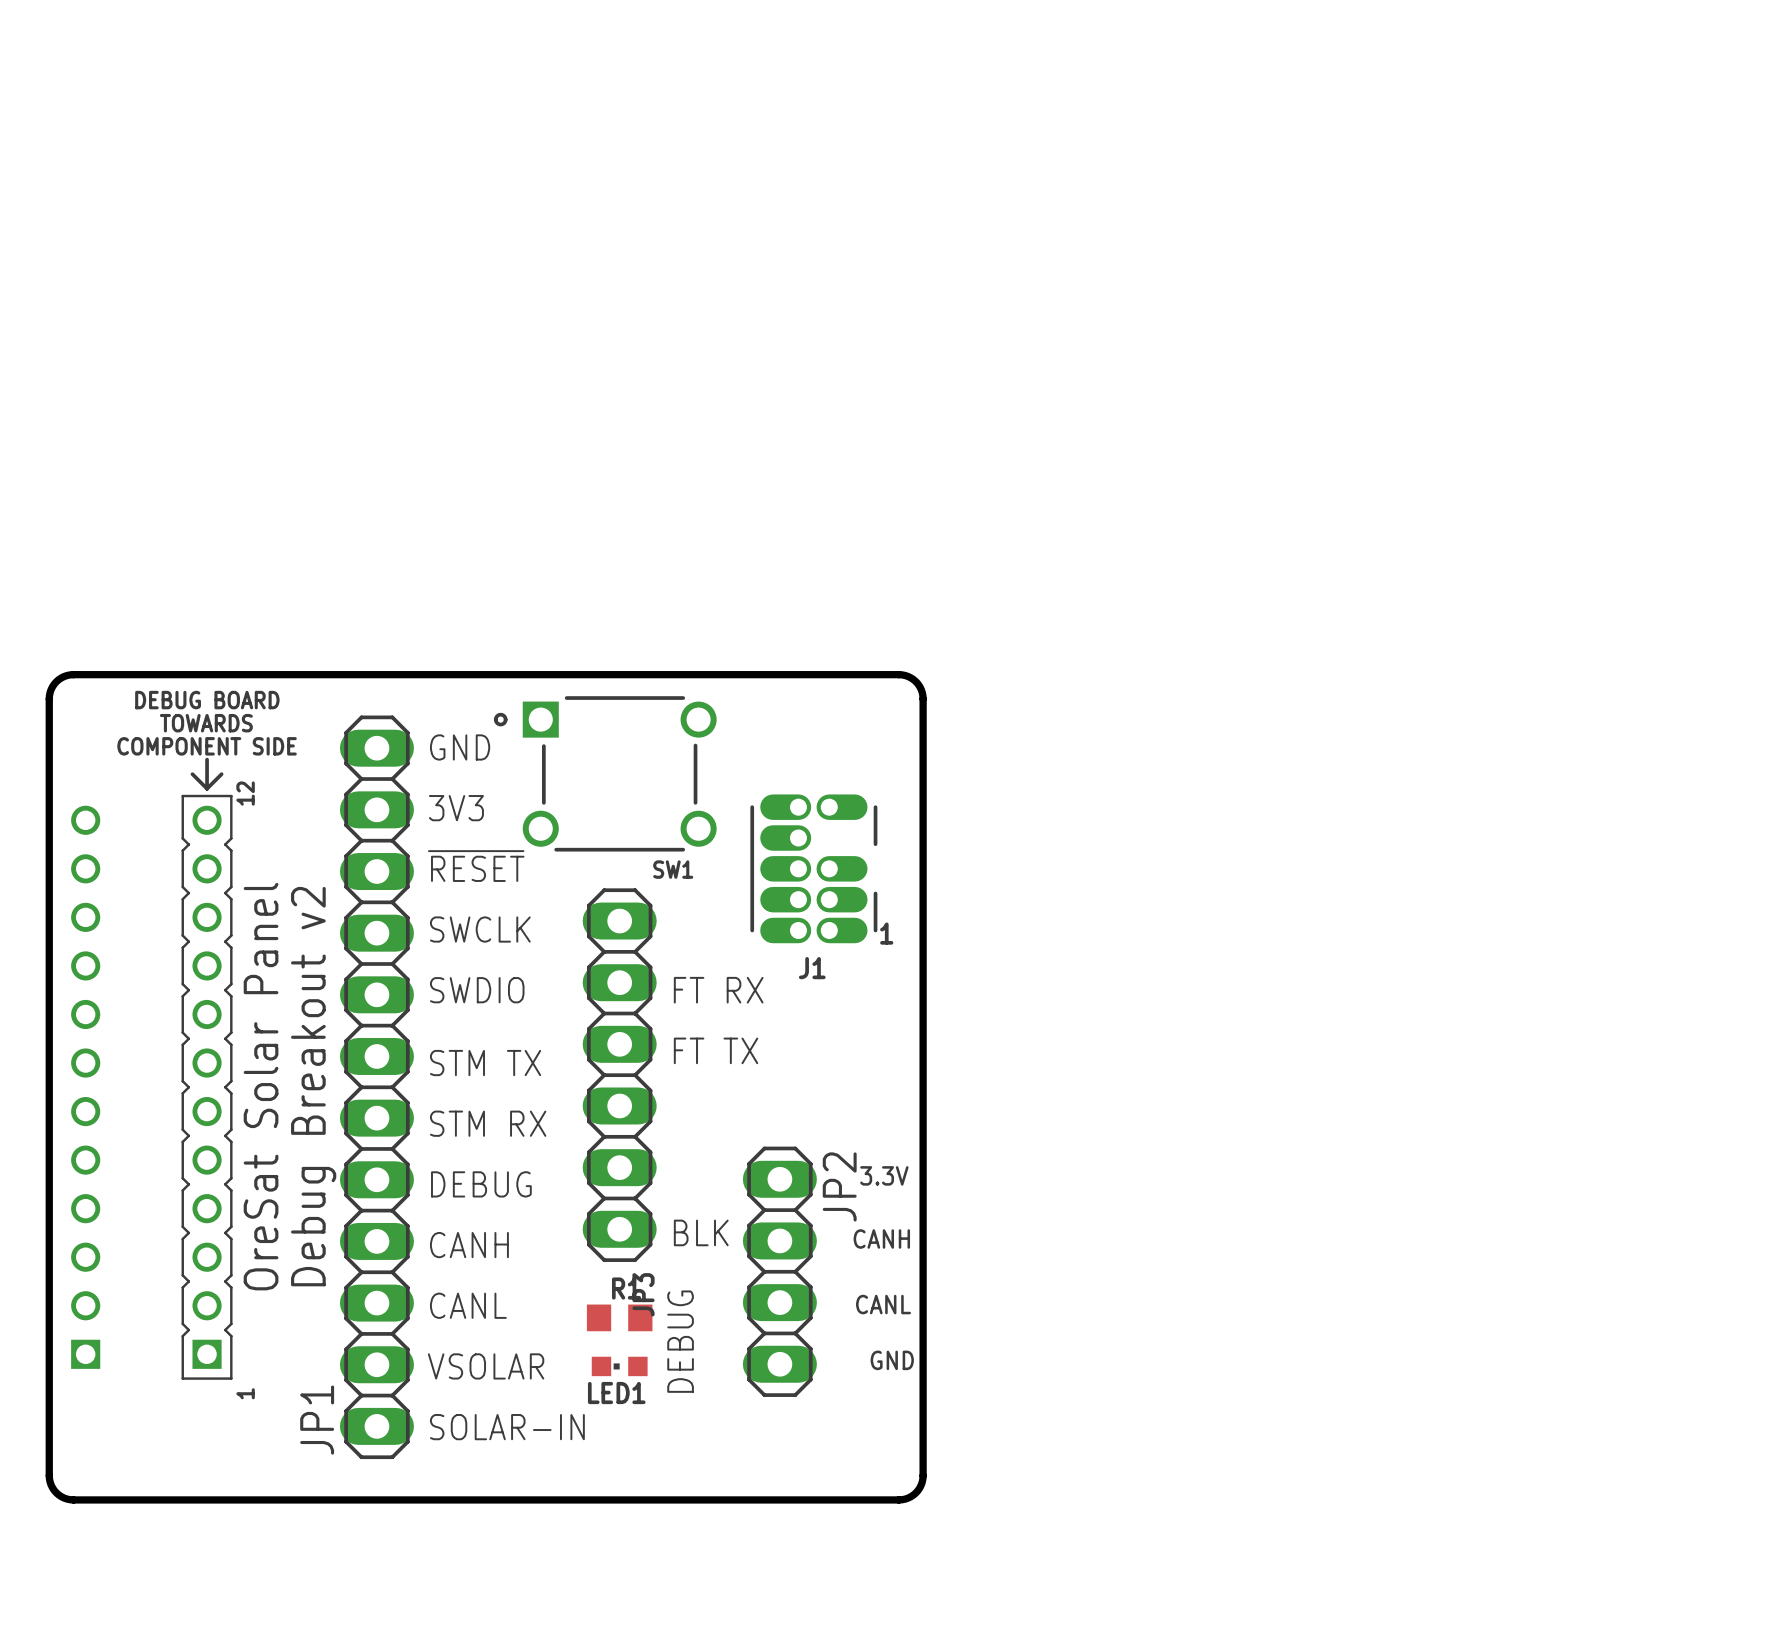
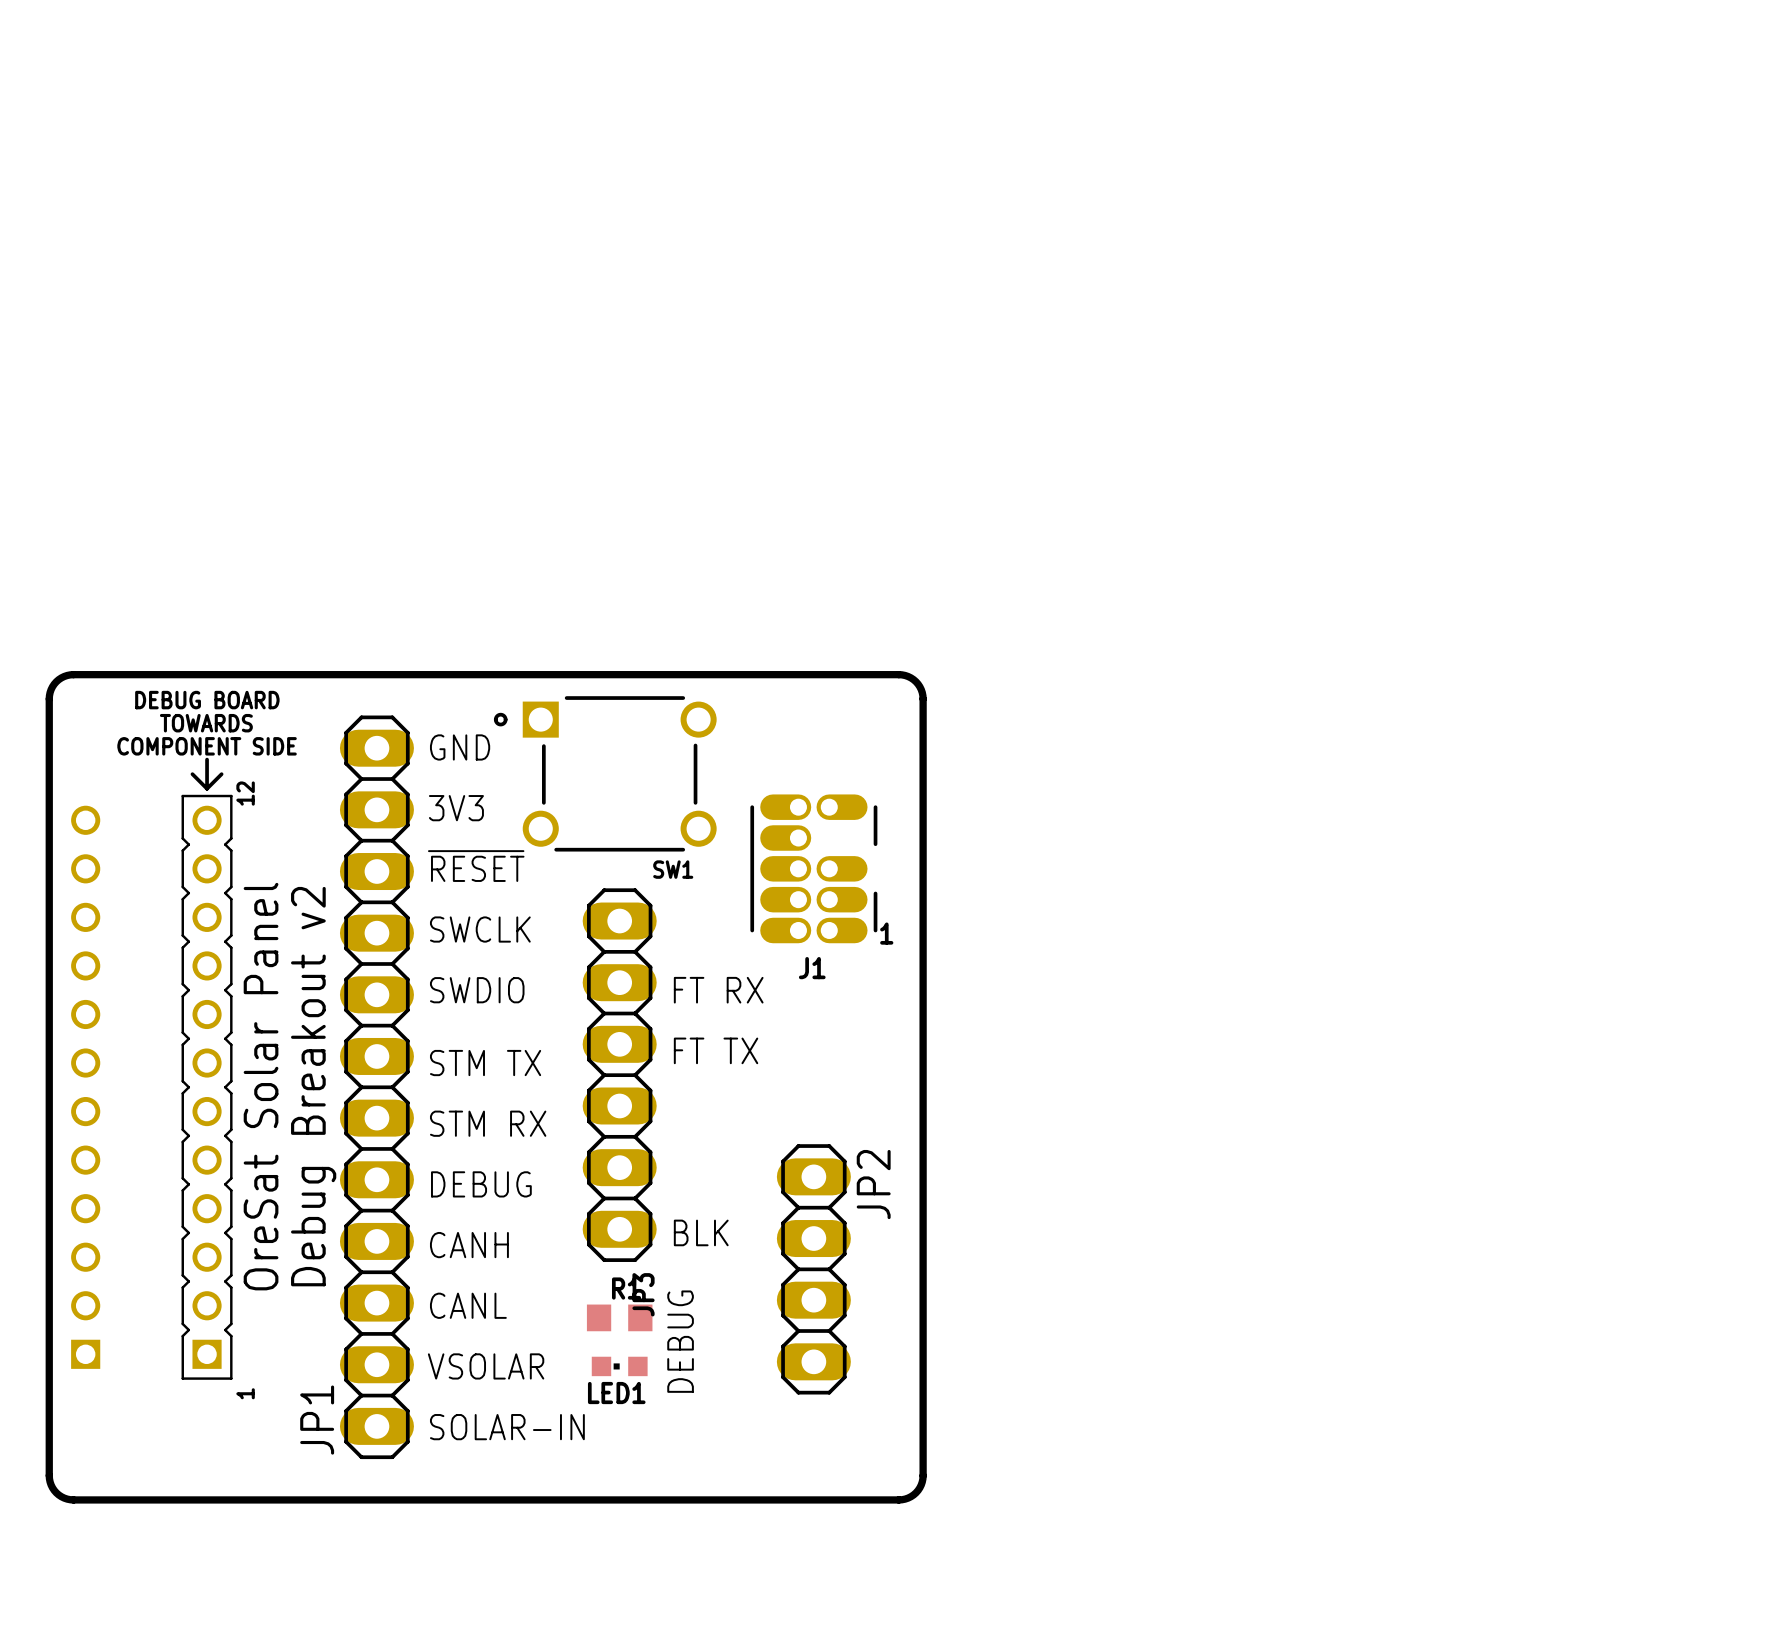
text: 3.3V (884, 1175) -> none
text: CANH (881, 1239) -> none
JP2 position: (779, 1271) -> (813, 1269)
text: CANL (883, 1304) -> none
text: GND (892, 1360) -> none

